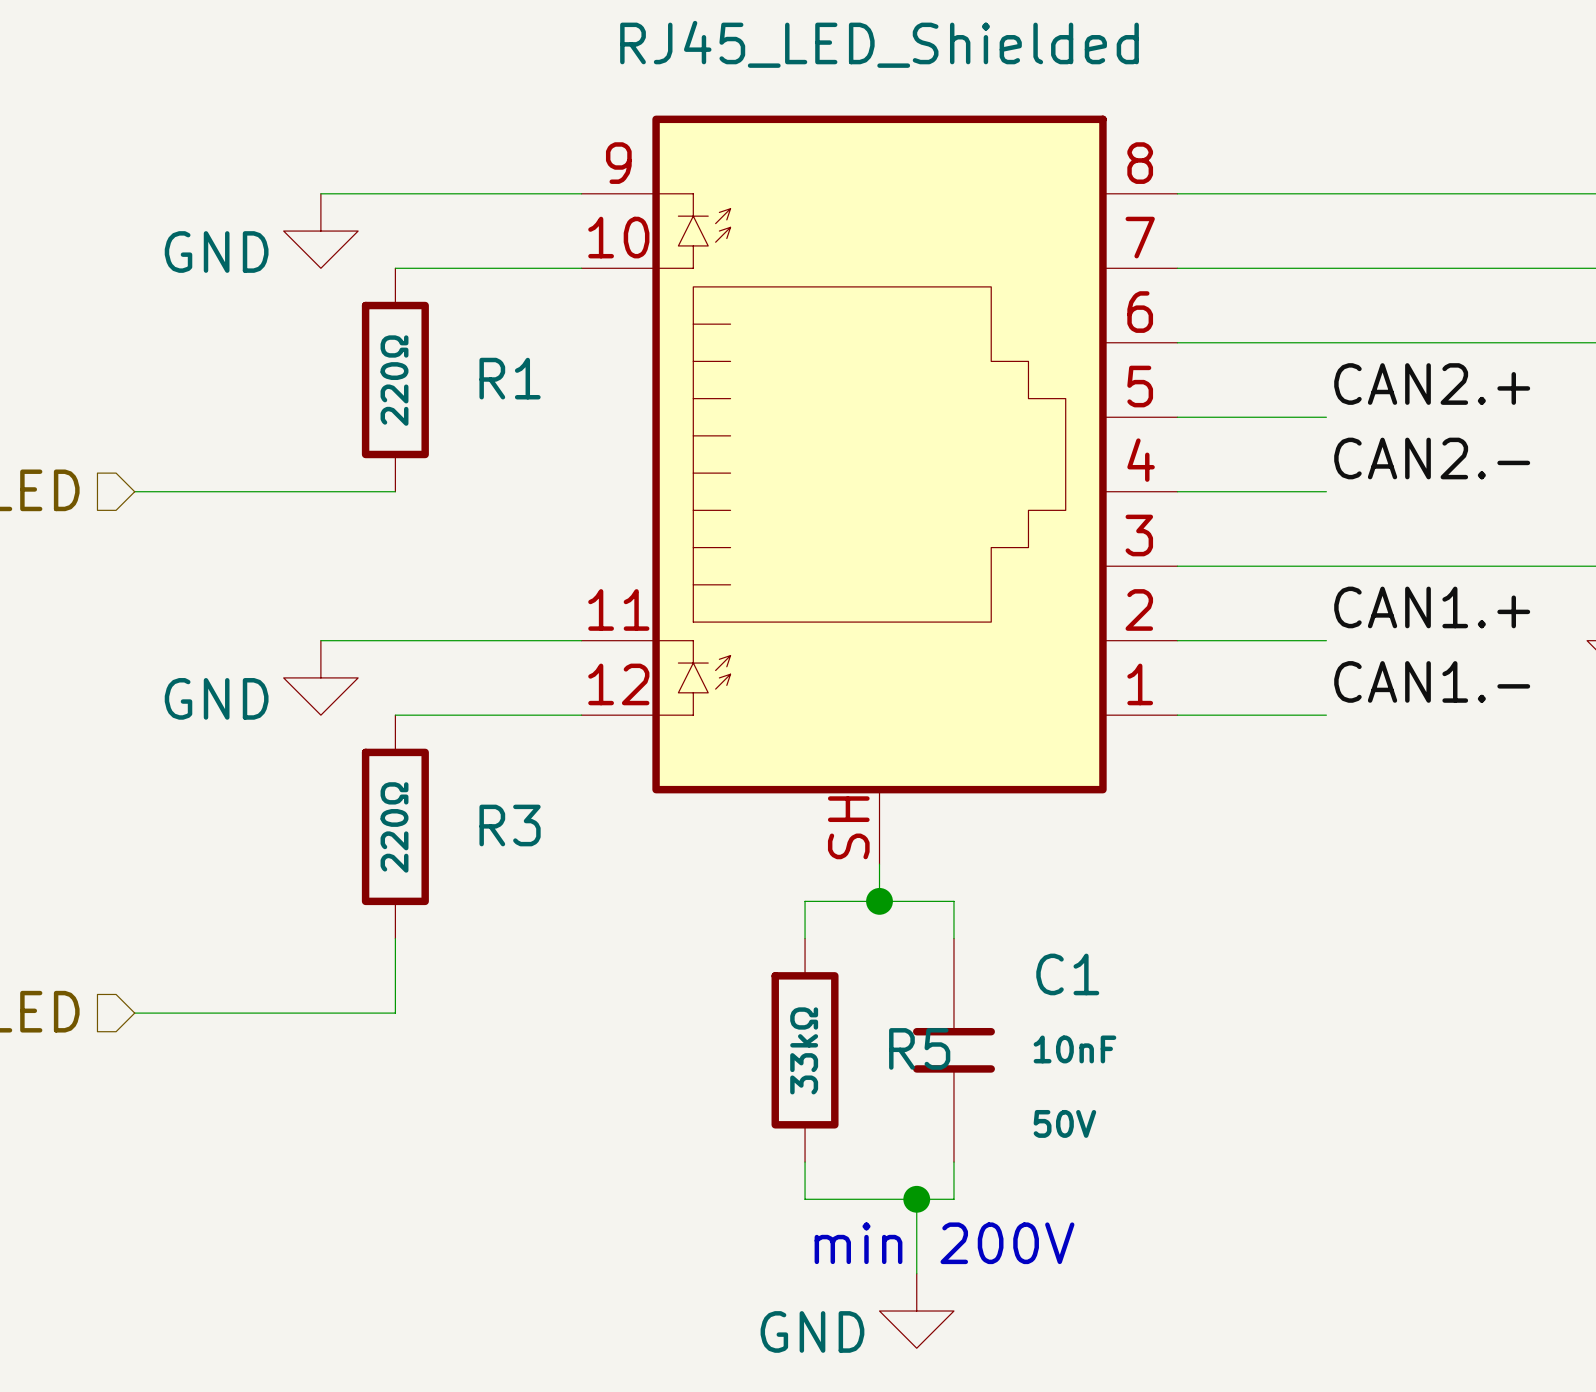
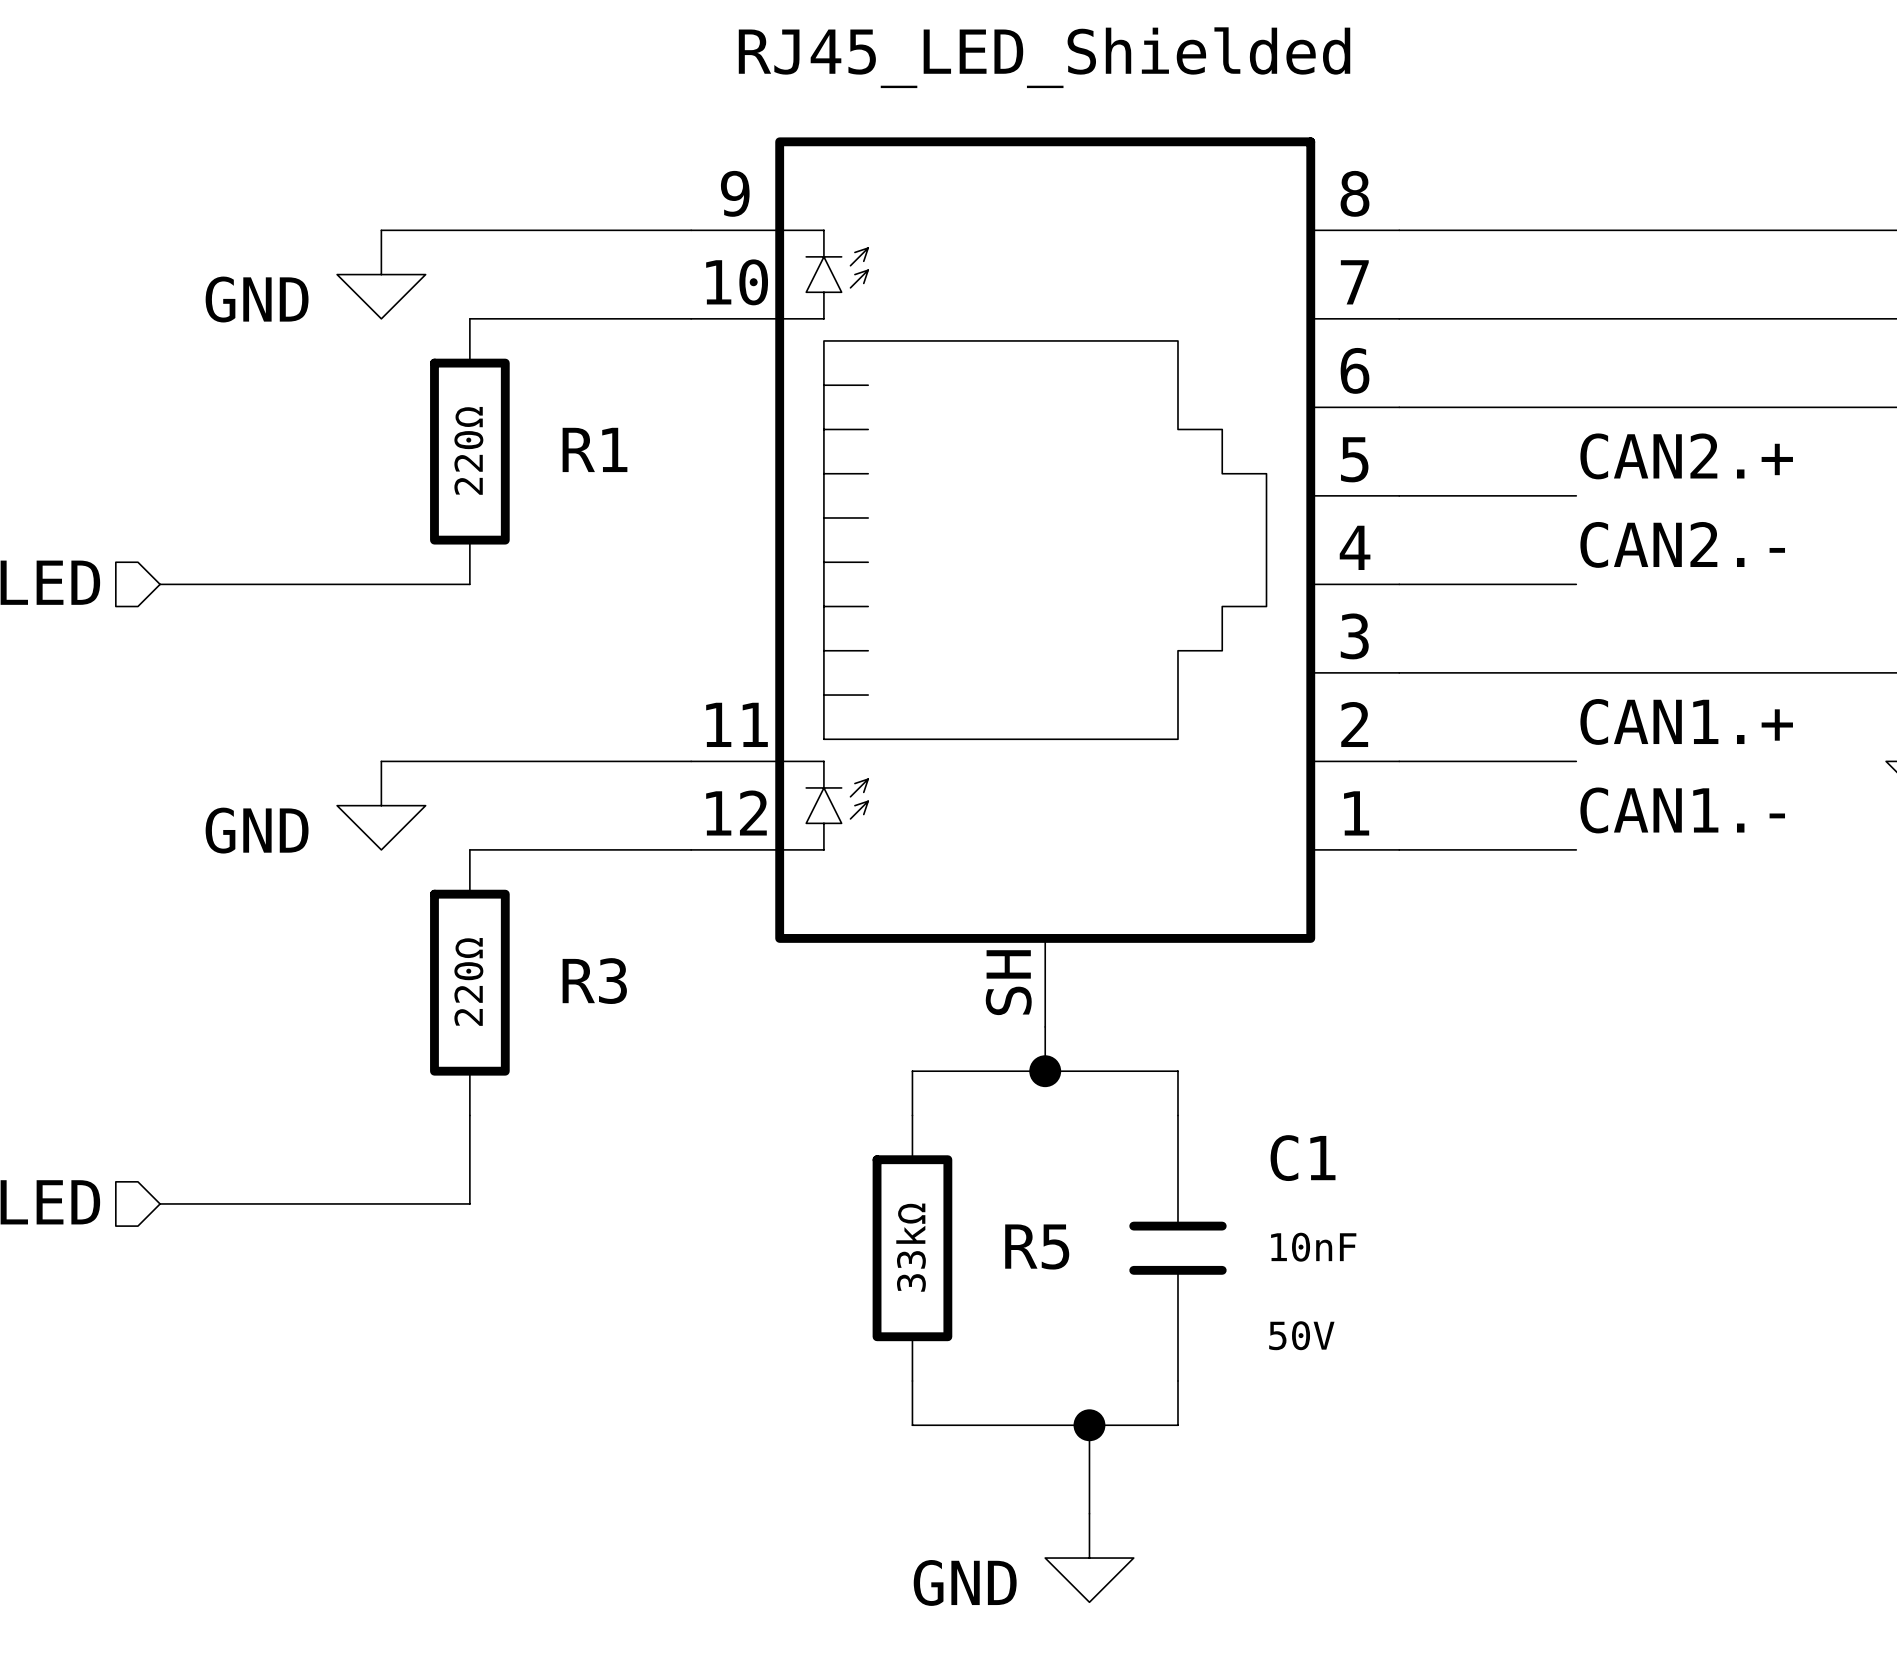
wire: (805, 901) (805, 938) -> (956, 1071) (912, 1071) (912, 1115)
wire: (953, 901) (953, 938) -> (1133, 1071) (1177, 1071) (1177, 1115)
R5 position: (805, 1050) -> (912, 1248)
C1 position: (953, 1050) -> (1177, 1248)
wire: (805, 1162) (805, 1199) -> (912, 1380) (912, 1425) (956, 1425)
wire: (953, 1162) (953, 1199) -> (1177, 1380) (1177, 1425) (1133, 1425)
text: min 200V (944, 1243) -> none

